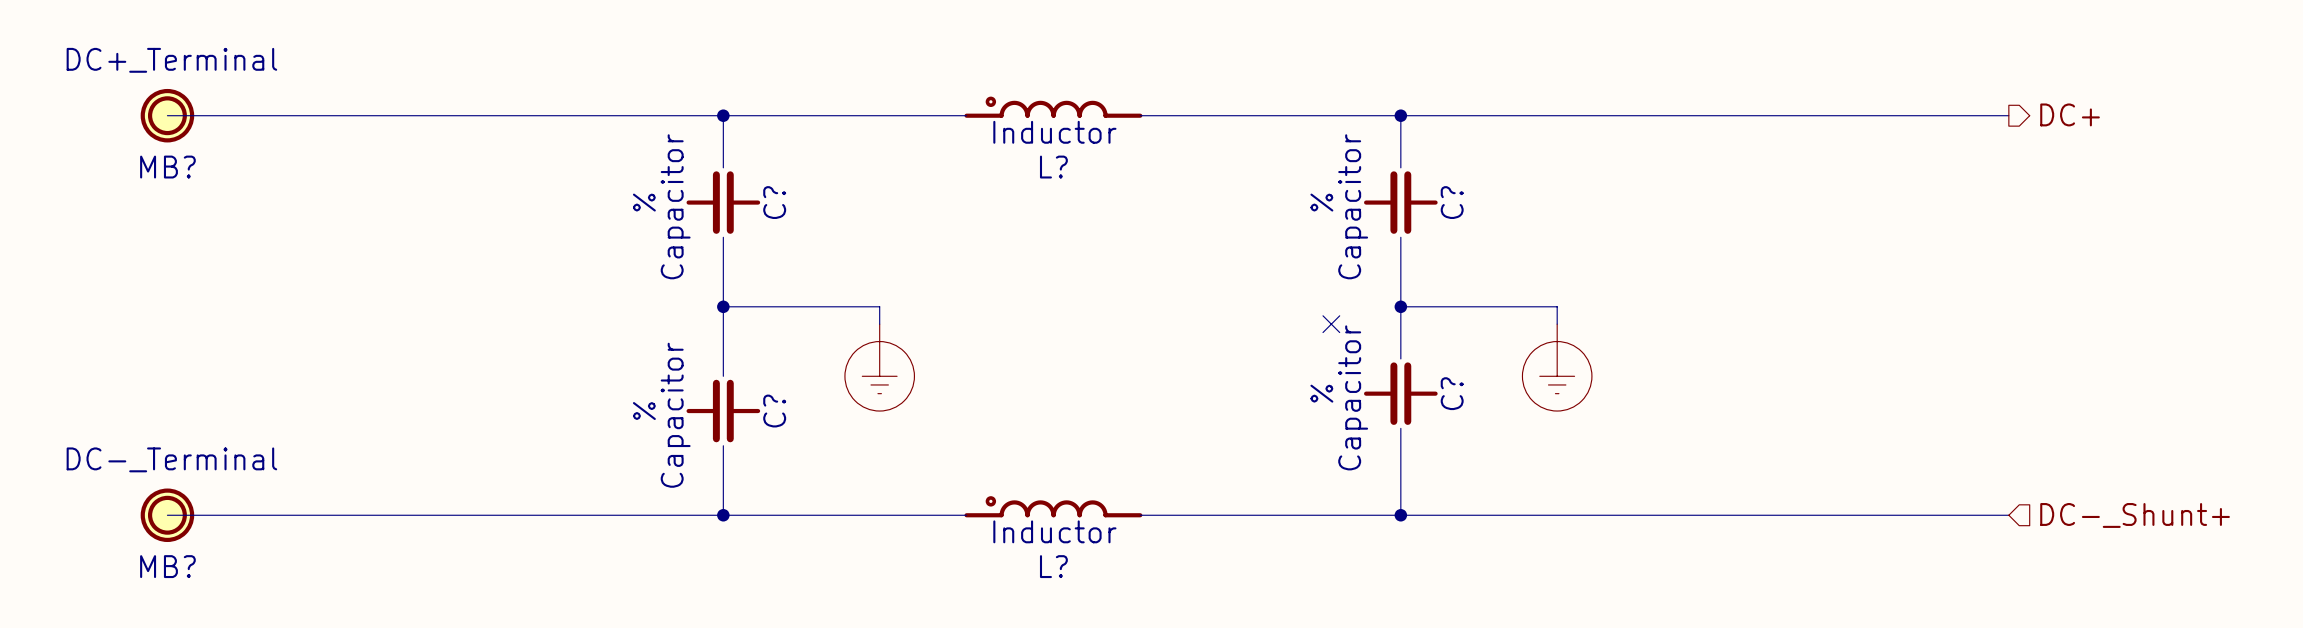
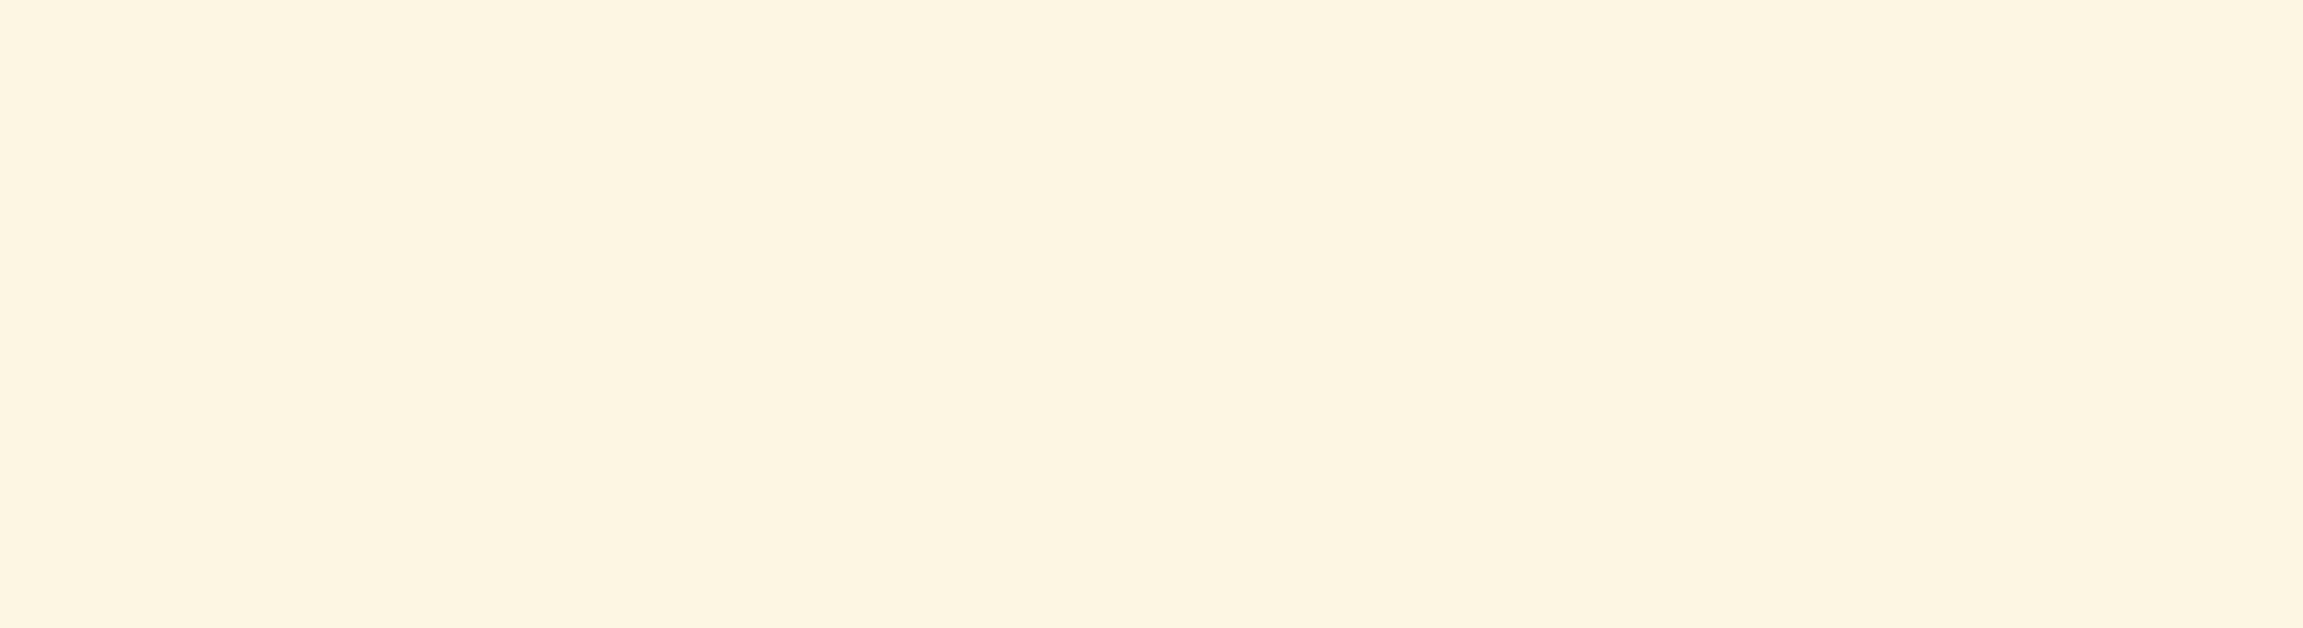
L?: Inductor (1053, 107) -> none
hierarchical label: DC+ (2070, 114) -> none
wire: (167, 115) (966, 115) -> none
MB?: DC+_Terminal (167, 115) -> none
wire: (723, 115) (723, 167) -> none
junction: (723, 115) -> none
wire: (1140, 115) (2008, 115) -> none
wire: (1400, 115) (1400, 167) -> none
junction: (1400, 115) -> none
C?: Capacitor (723, 202) -> none
C?: Capacitor (1400, 202) -> none
wire: (723, 237) (723, 376) -> none
wire: (1400, 237) (1400, 358) -> none
wire: (723, 306) (879, 306) (879, 324) -> none
junction: (723, 306) -> none
wire: (1400, 306) (1557, 306) (1557, 324) -> none
junction: (1400, 306) -> none
no-connect mark: (1331, 324) -> none
power symbol: (879, 367) -> none
power symbol: (1557, 367) -> none
C?: Capacitor (1400, 393) -> none
C?: Capacitor (723, 411) -> none
wire: (1400, 428) (1400, 515) -> none
wire: (723, 445) (723, 515) -> none
L?: Inductor (1053, 506) -> none
wire: (167, 515) (966, 515) -> none
MB?: DC-_Terminal (167, 515) -> none
junction: (723, 515) -> none
wire: (1140, 515) (2008, 515) -> none
junction: (1400, 515) -> none
hierarchical label: DC-_Shunt+ (2135, 515) -> none

